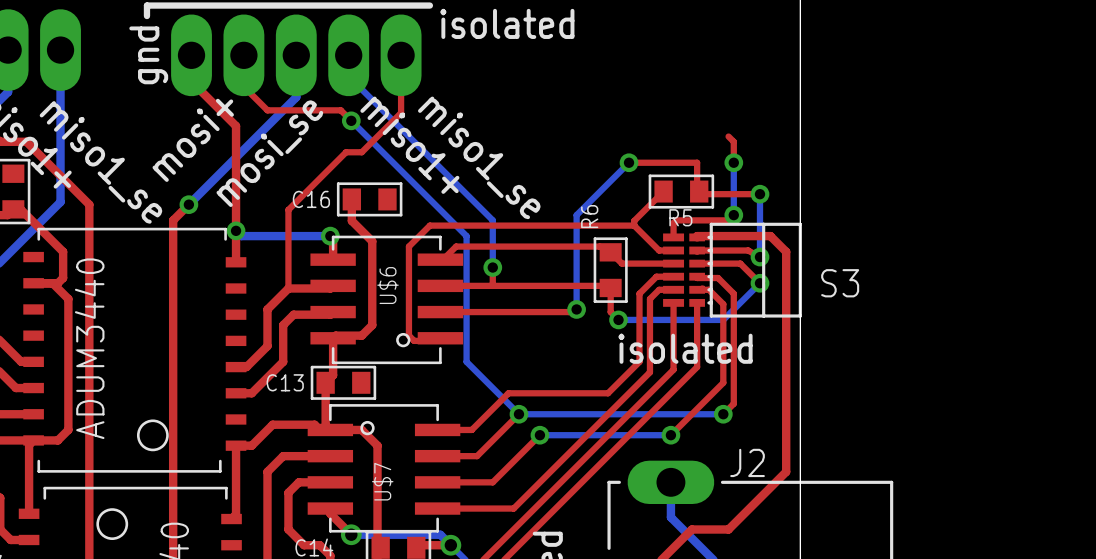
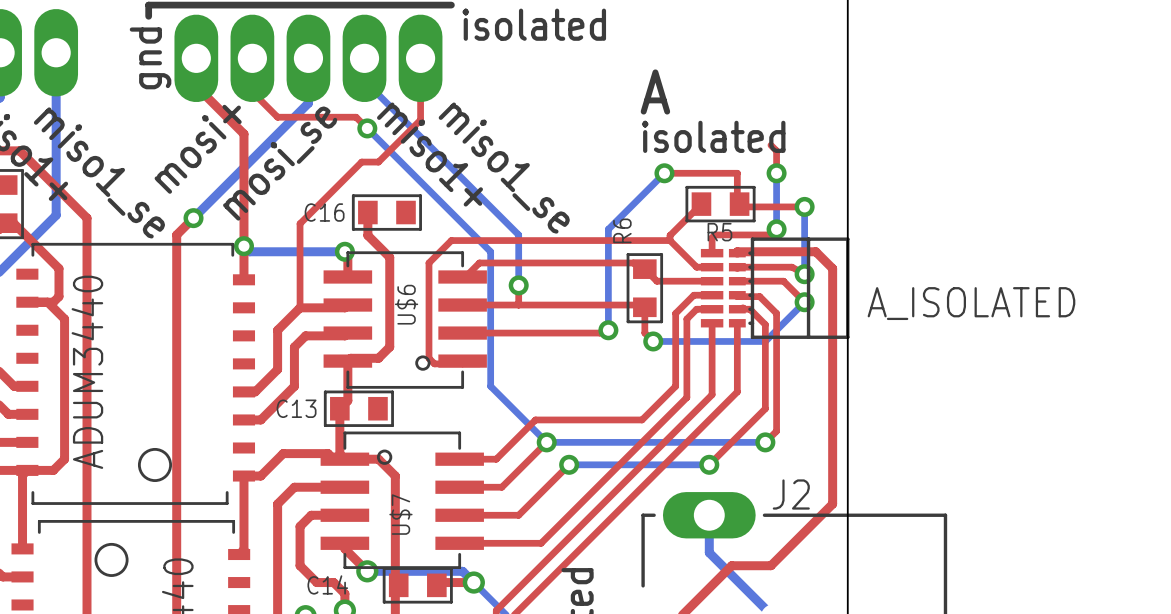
text: none -> A (655, 91)
S3 name: S3 (840, 283) -> A_ISOLATED (971, 303)
text position: isolated (685, 348) -> isolated (713, 136)

